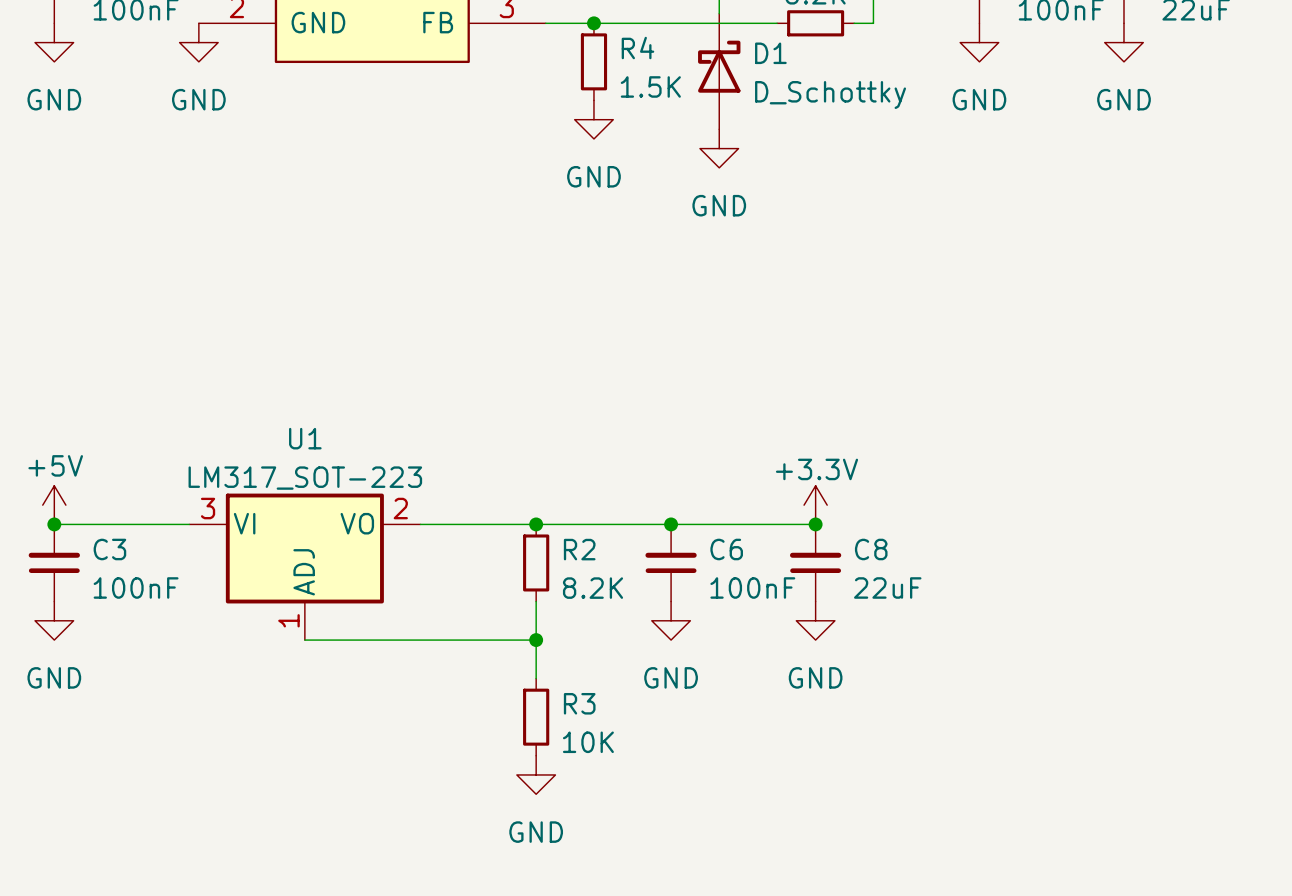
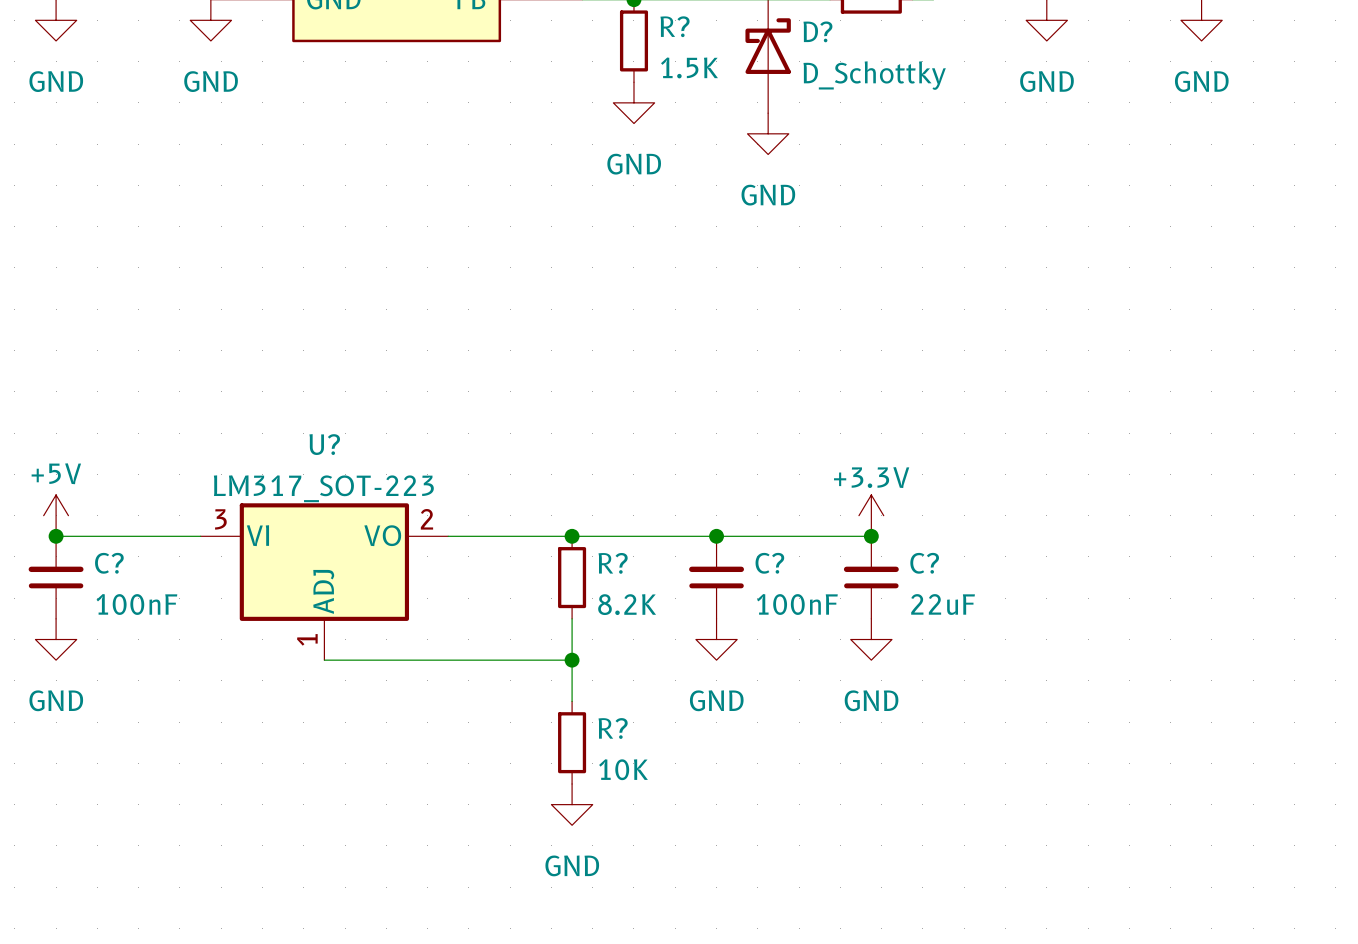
R4 name: R4 (637, 48) -> R? (675, 26)
D1 name: D1 (770, 53) -> D? (817, 31)
U1 name: U1 (305, 438) -> U? (324, 444)
C3 name: C3 (109, 549) -> C? (109, 563)
R2 name: R2 (579, 549) -> R? (613, 563)
C6 name: C6 (726, 549) -> C? (769, 563)
C8 name: C8 (871, 549) -> C? (924, 563)
R3 name: R3 (579, 703) -> R? (613, 728)

